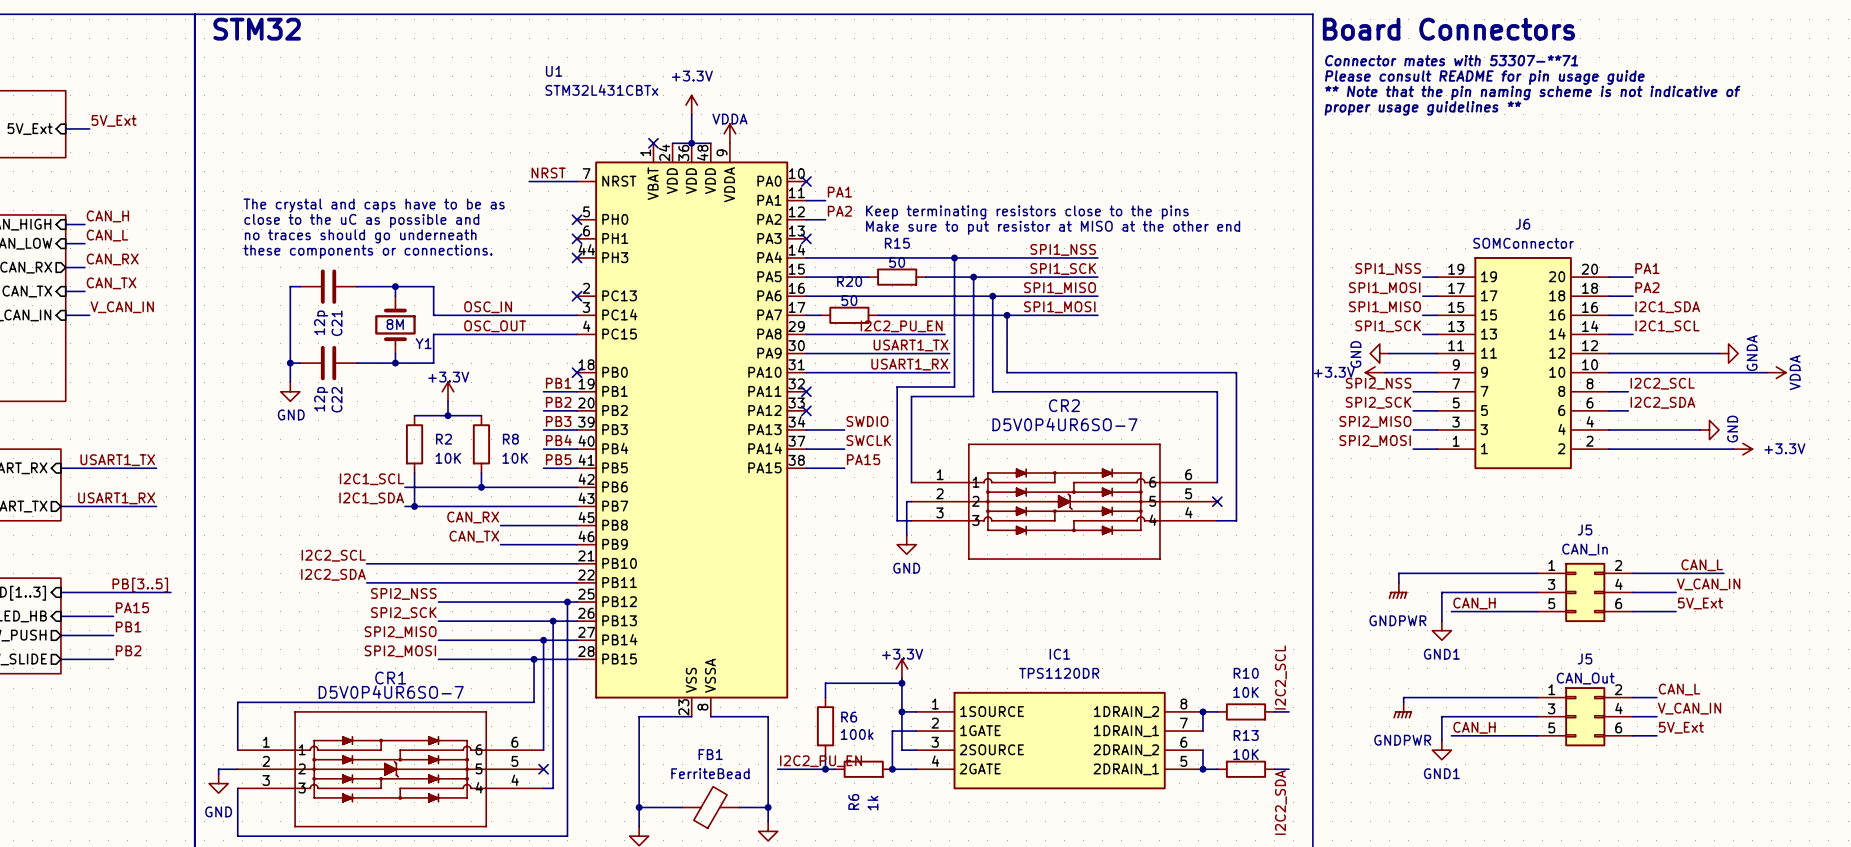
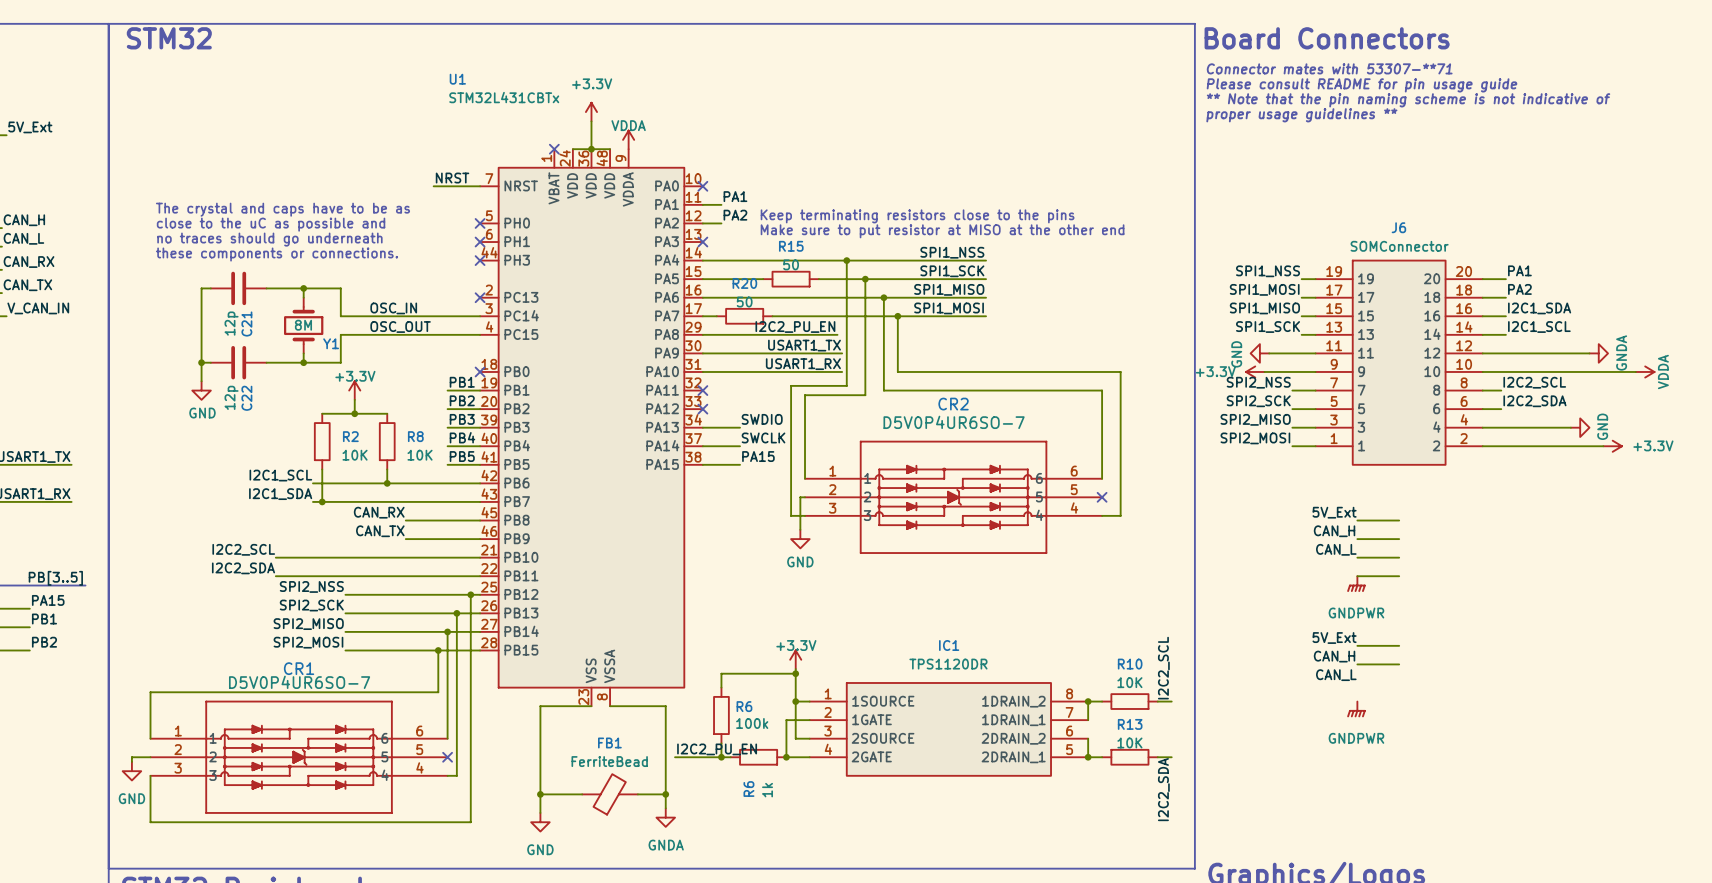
label: none -> 5V_Ext (1334, 512)
wire: none -> (1357, 520) (1399, 520)
label: none -> CAN_H (1334, 531)
wire: none -> (1357, 539) (1399, 539)
label: none -> CAN_L (1336, 549)
label: CAN_L (1702, 565) -> none
wire: (1537, 573) (1398, 573) (1398, 582) -> none
wire: (1633, 573) (1723, 573) -> none
label: V_CAN_IN (1708, 584) -> none
power symbol: GNDPWR (1397, 590) -> none
power symbol: none -> GNDPWR (1356, 584)
wire: (1537, 592) (1441, 592) (1441, 621) -> none
J5: CAN_In (1585, 592) -> none
wire: (1633, 592) (1676, 592) -> (1357, 557) (1399, 557)
label: CAN_H (1474, 603) -> none
label: 5V_Ext (1700, 603) -> none
wire: (1451, 611) (1537, 611) -> none
wire: (1633, 611) (1676, 611) -> (1357, 576) (1399, 576)
power symbol: GND1 (1441, 630) -> none
label: none -> 5V_Ext (1334, 638)
wire: none -> (1357, 645) (1399, 645)
label: none -> CAN_H (1334, 656)
wire: none -> (1357, 664) (1399, 664)
label: none -> CAN_L (1336, 675)
label: CAN_L (1679, 689) -> none
wire: (1537, 697) (1403, 697) (1403, 702) -> none
wire: (1633, 697) (1656, 697) -> none
label: V_CAN_IN (1689, 708) -> none
power symbol: GNDPWR (1402, 710) -> none
wire: (1537, 716) (1441, 716) (1441, 740) -> none
J5: CAN_Out (1585, 716) -> none
wire: (1633, 716) (1656, 716) -> none
power symbol: none -> GNDPWR (1356, 709)
label: CAN_H (1474, 727) -> none
label: 5V_Ext (1681, 727) -> none
wire: (1451, 735) (1537, 735) -> none
wire: (1633, 735) (1656, 735) -> none
power symbol: GND1 (1441, 750) -> none

